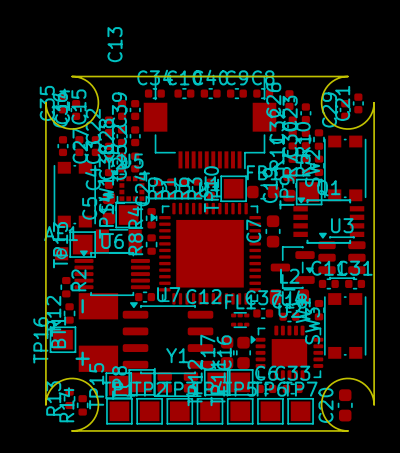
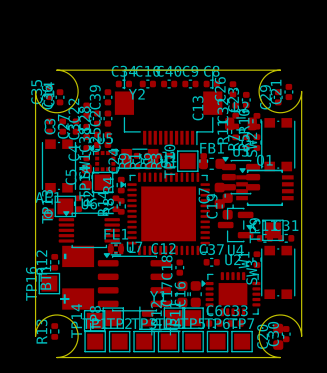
C15 name: C15 (78, 106) -> C3 (49, 126)
C13 position: (122, 110) -> (203, 161)
C30 position: (305, 139) -> (286, 334)
C19 position: (289, 185) -> (227, 206)
TP9 position: (309, 192) -> (272, 230)
Y2 position: (118, 241) -> (139, 158)
U3 position: (341, 255) -> (240, 175)
R2 position: (66, 287) -> (78, 203)
L2 position: (289, 297) -> (240, 123)
C18 rotation: 0° (289, 316) -> 90° clockwise (179, 267)
C18 position: (289, 316) -> (179, 267)
FL1 position: (240, 320) -> (115, 248)
Y1 position: (177, 382) -> (158, 318)
TP15 name: TP15 (96, 386) -> TP14 (76, 321)
R14 position: (82, 405) -> (115, 203)

